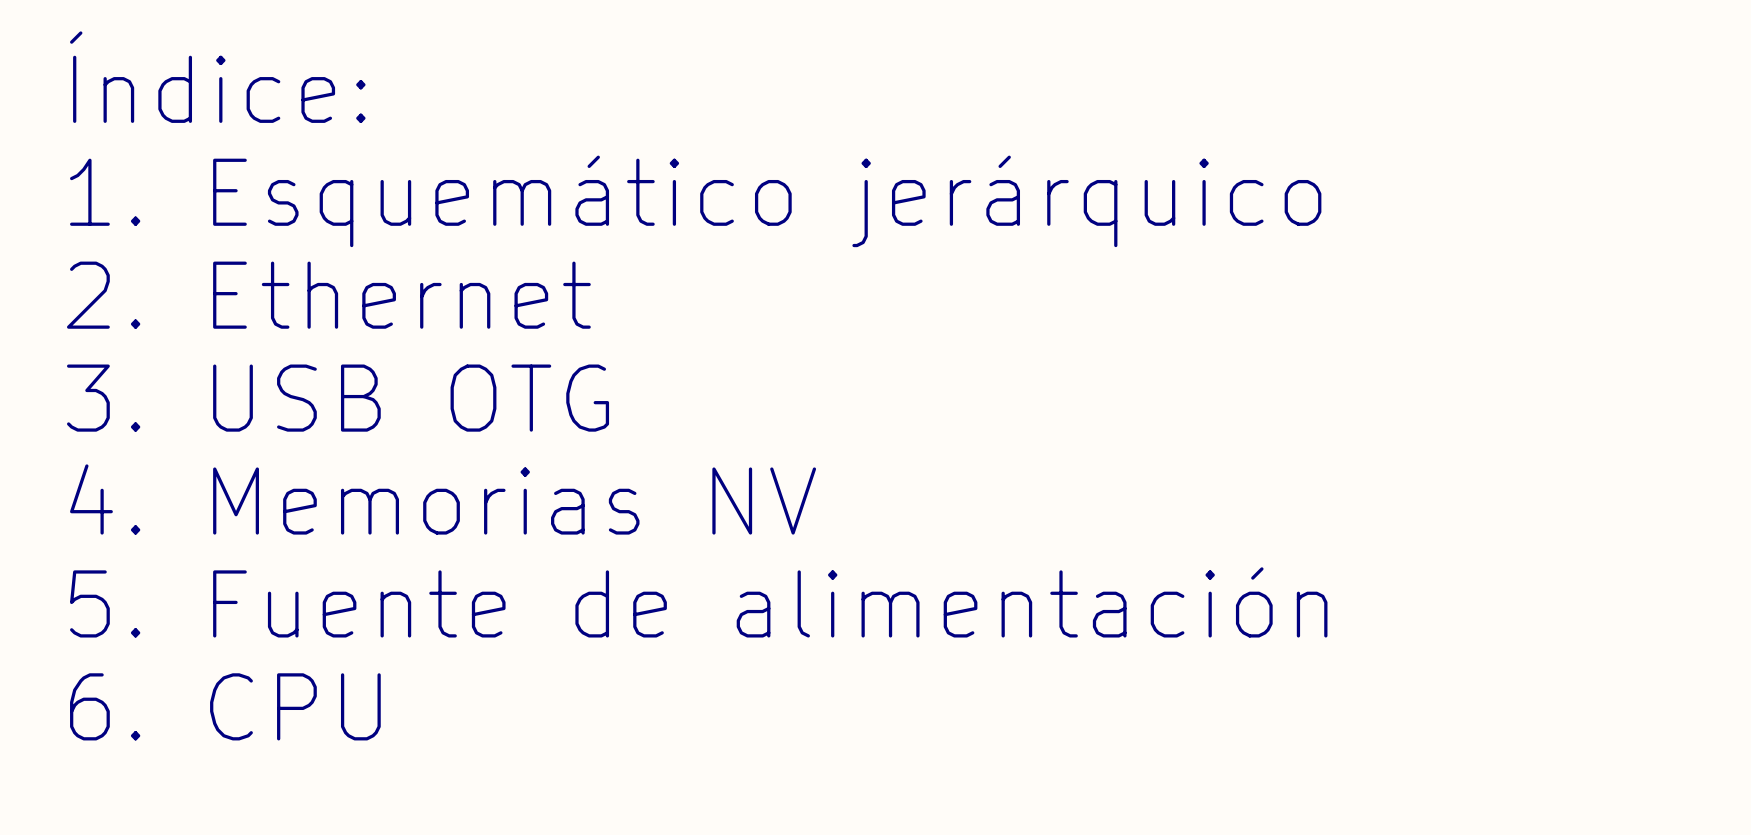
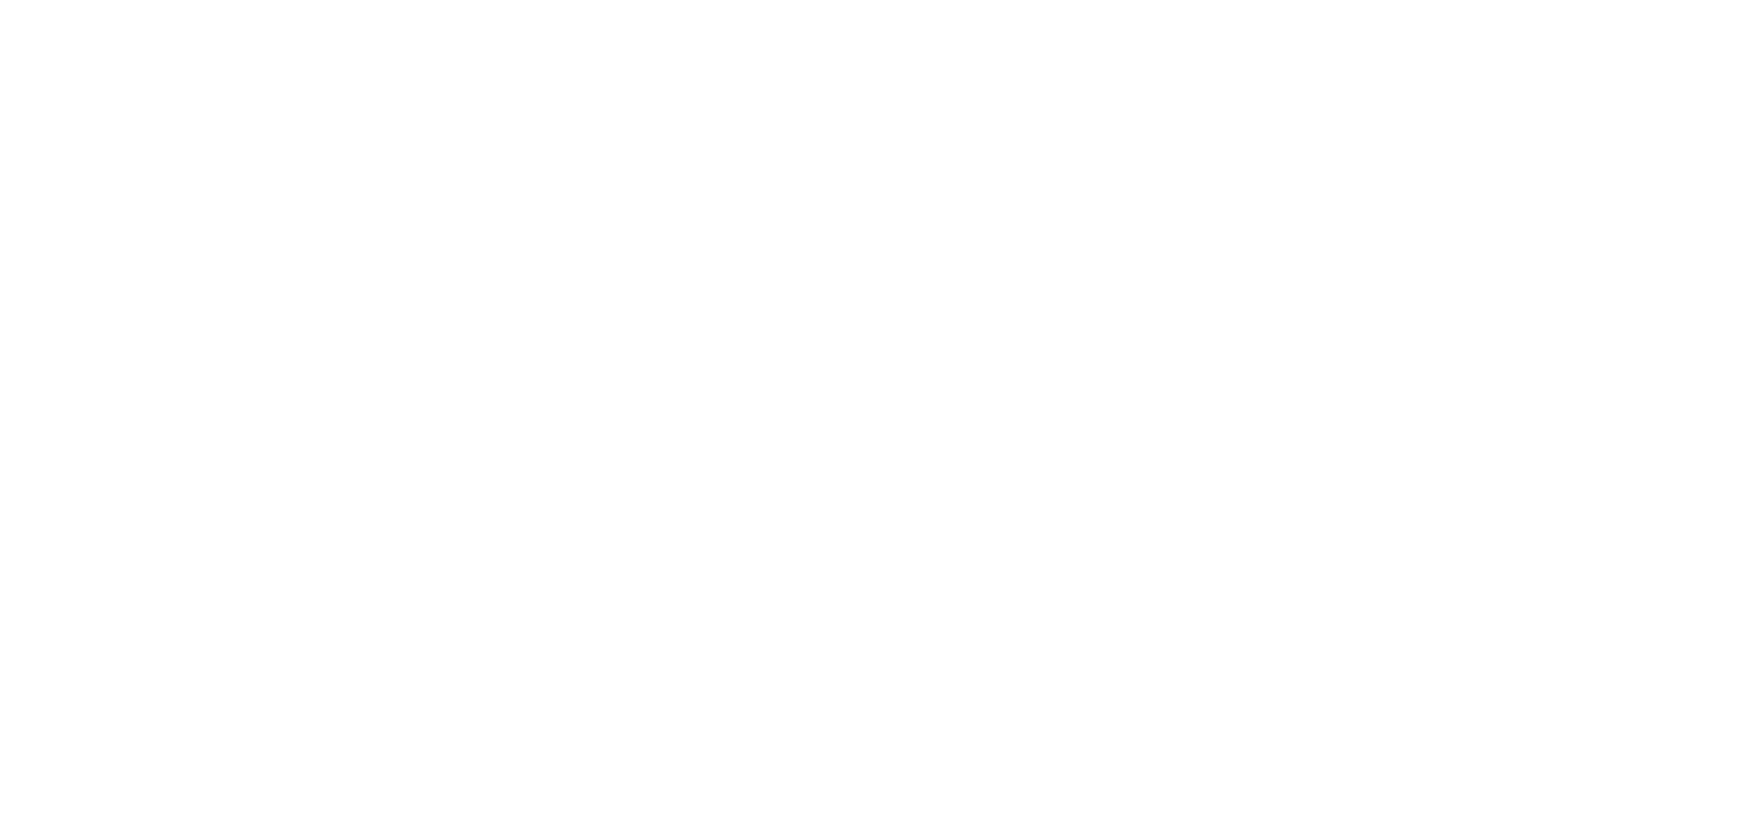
text: Índice: (217, 77) -> none
text: 1. Esquemático jerárquico (695, 201) -> none
text: 2. Ethernet (328, 295) -> none
text: 3. USB OTG (338, 398) -> none
text: 4. Memorias NV (443, 499) -> none
text: 5. Fuente de alimentación (698, 602) -> none
text: 6. CPU (225, 706) -> none

